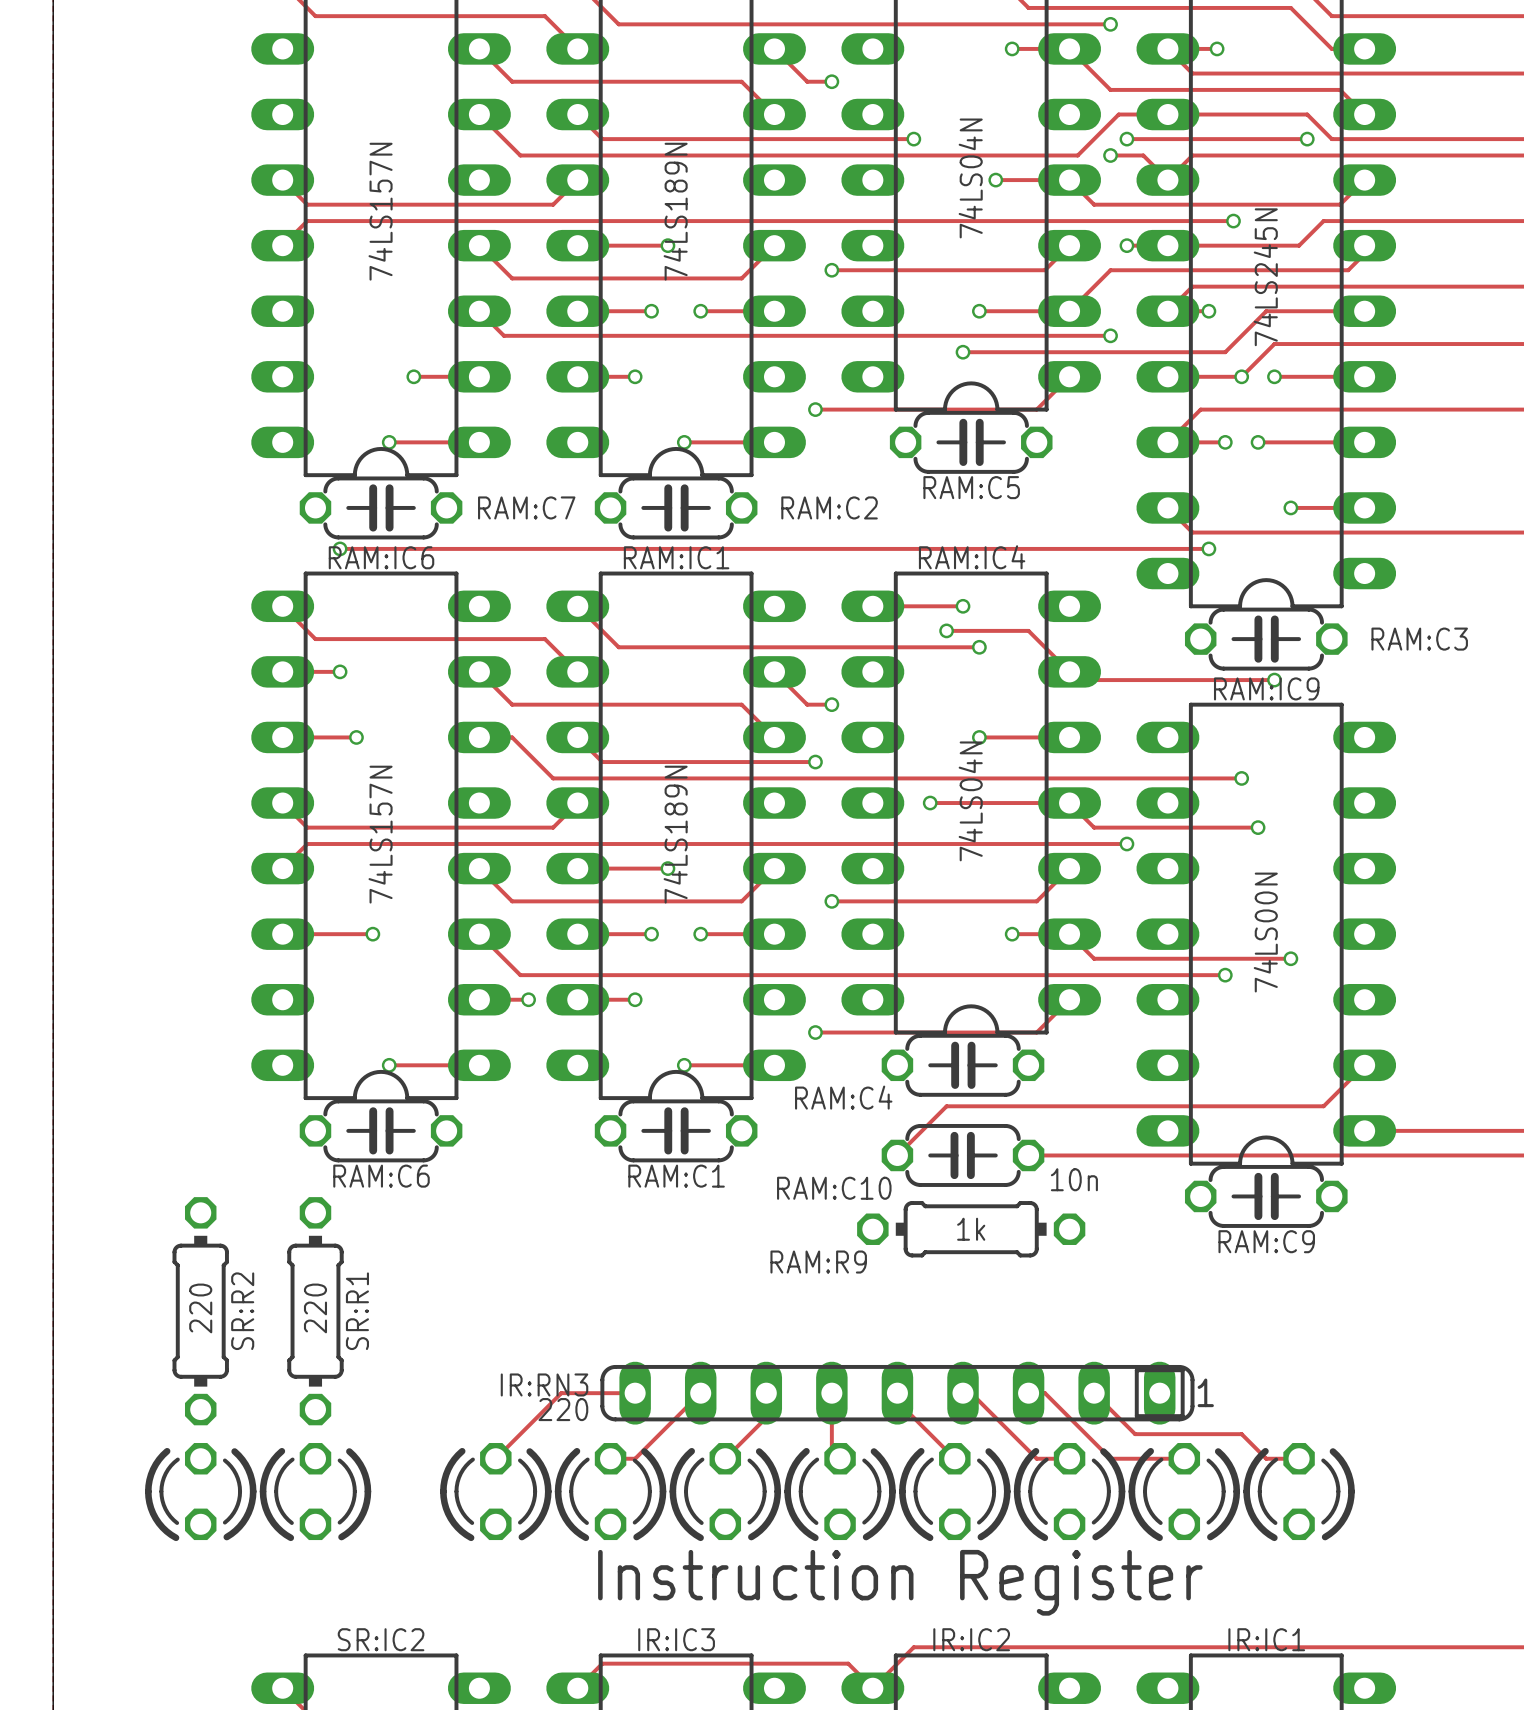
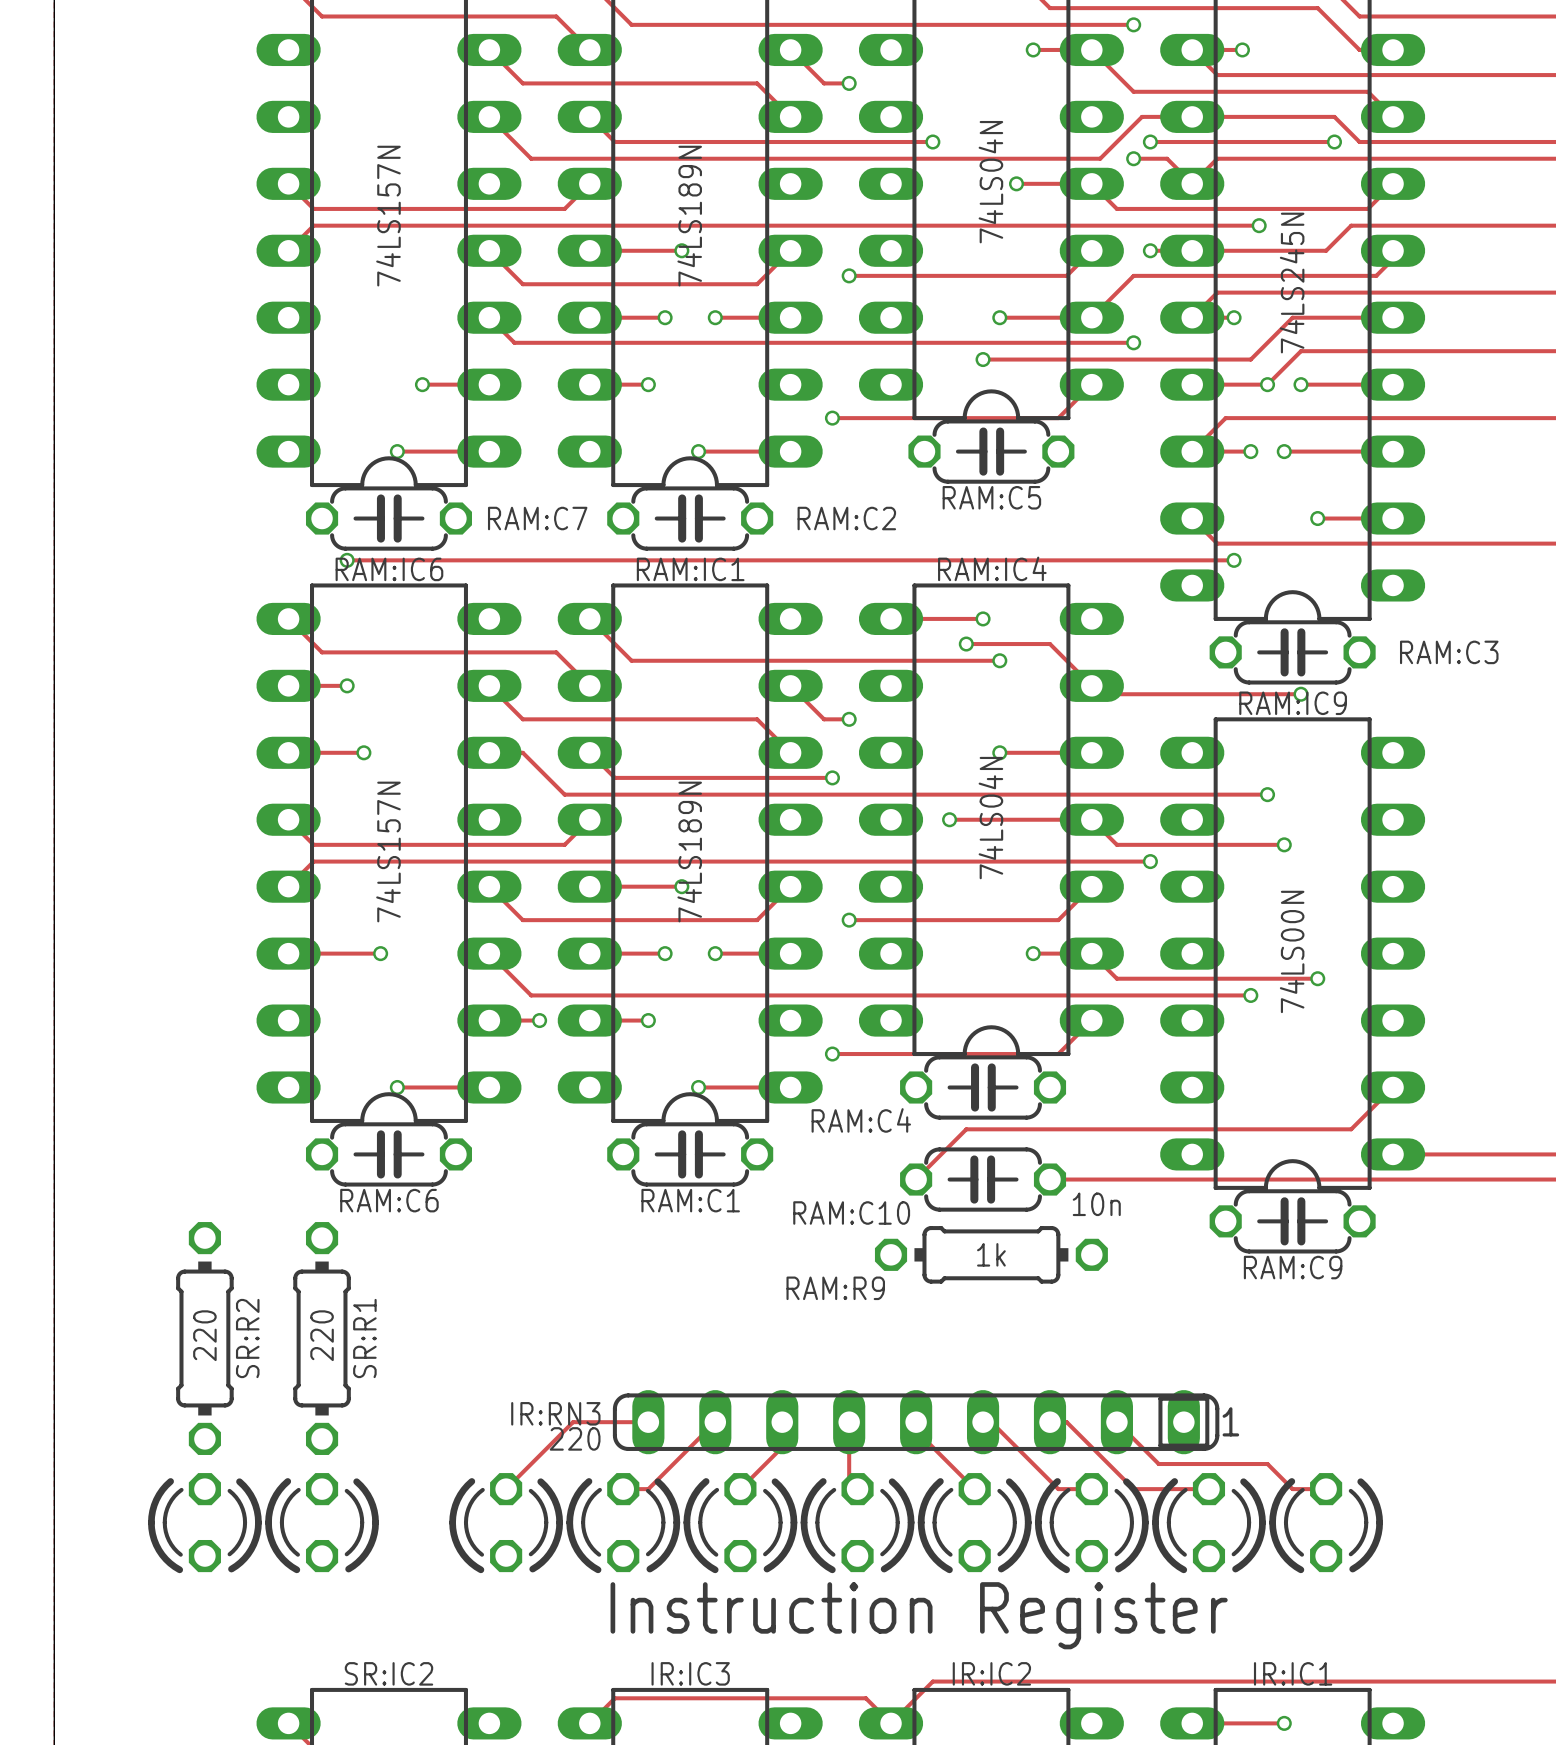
track: none -> (1192, 1723) (1284, 1723)
via: none -> (1284, 1723)

